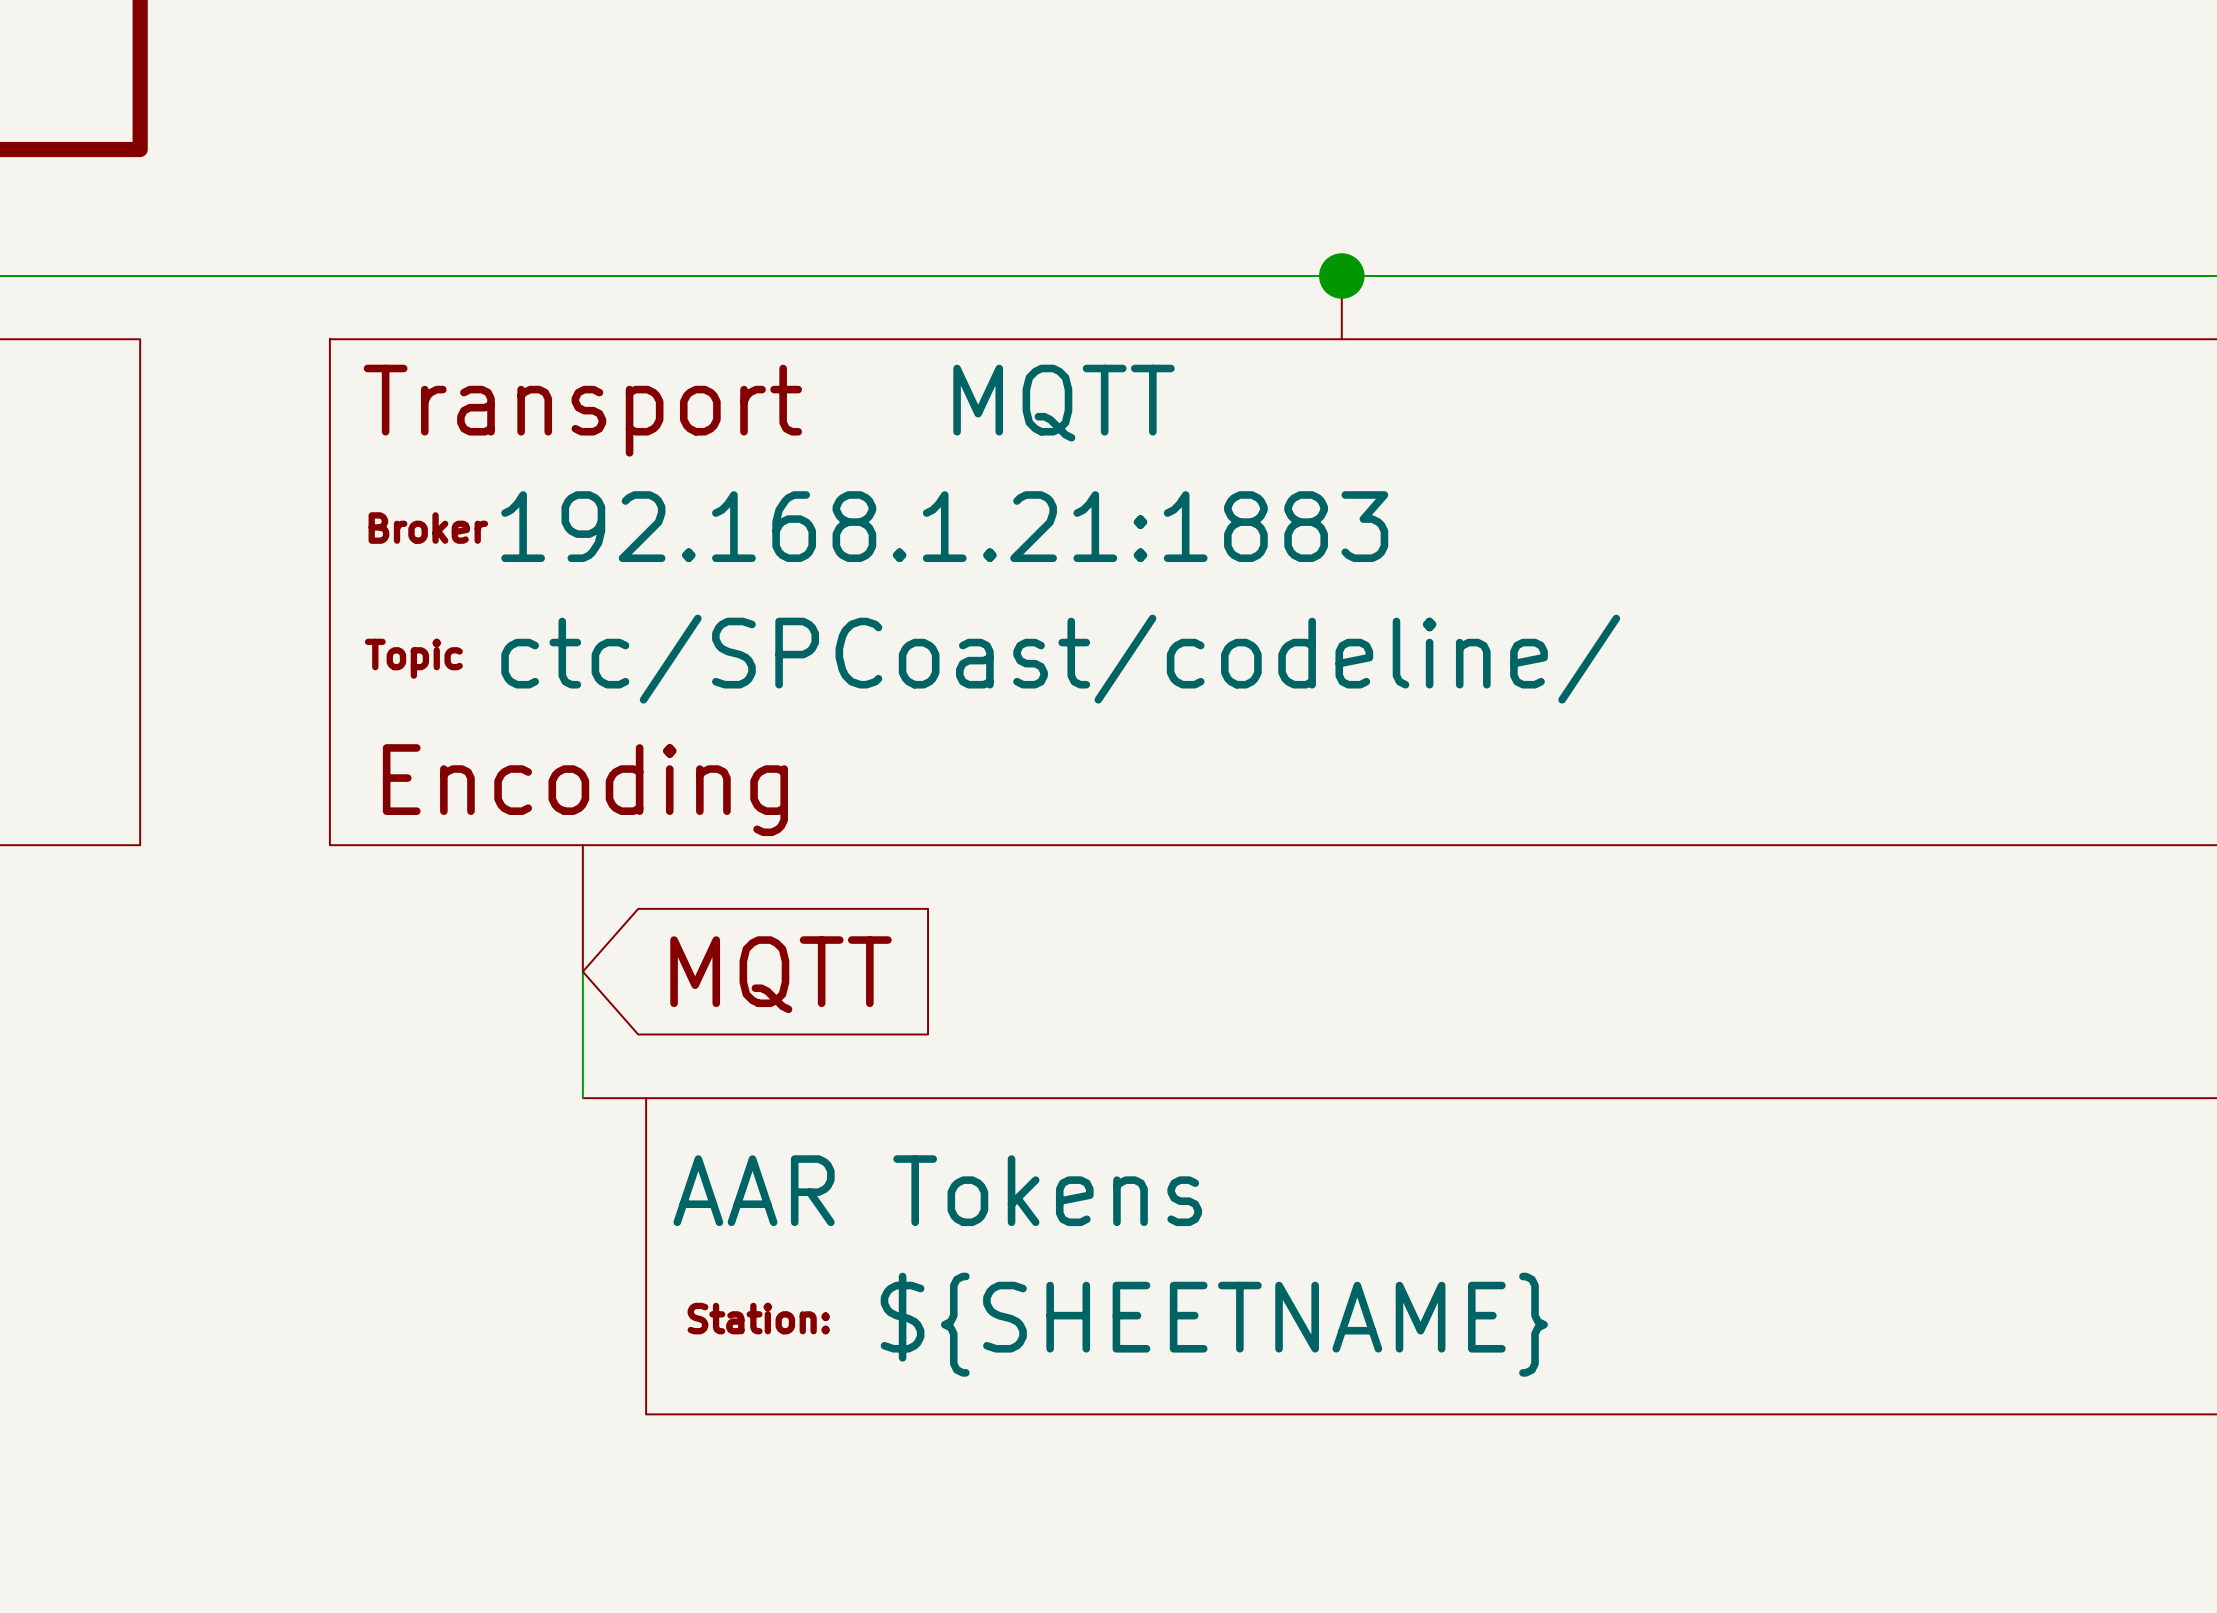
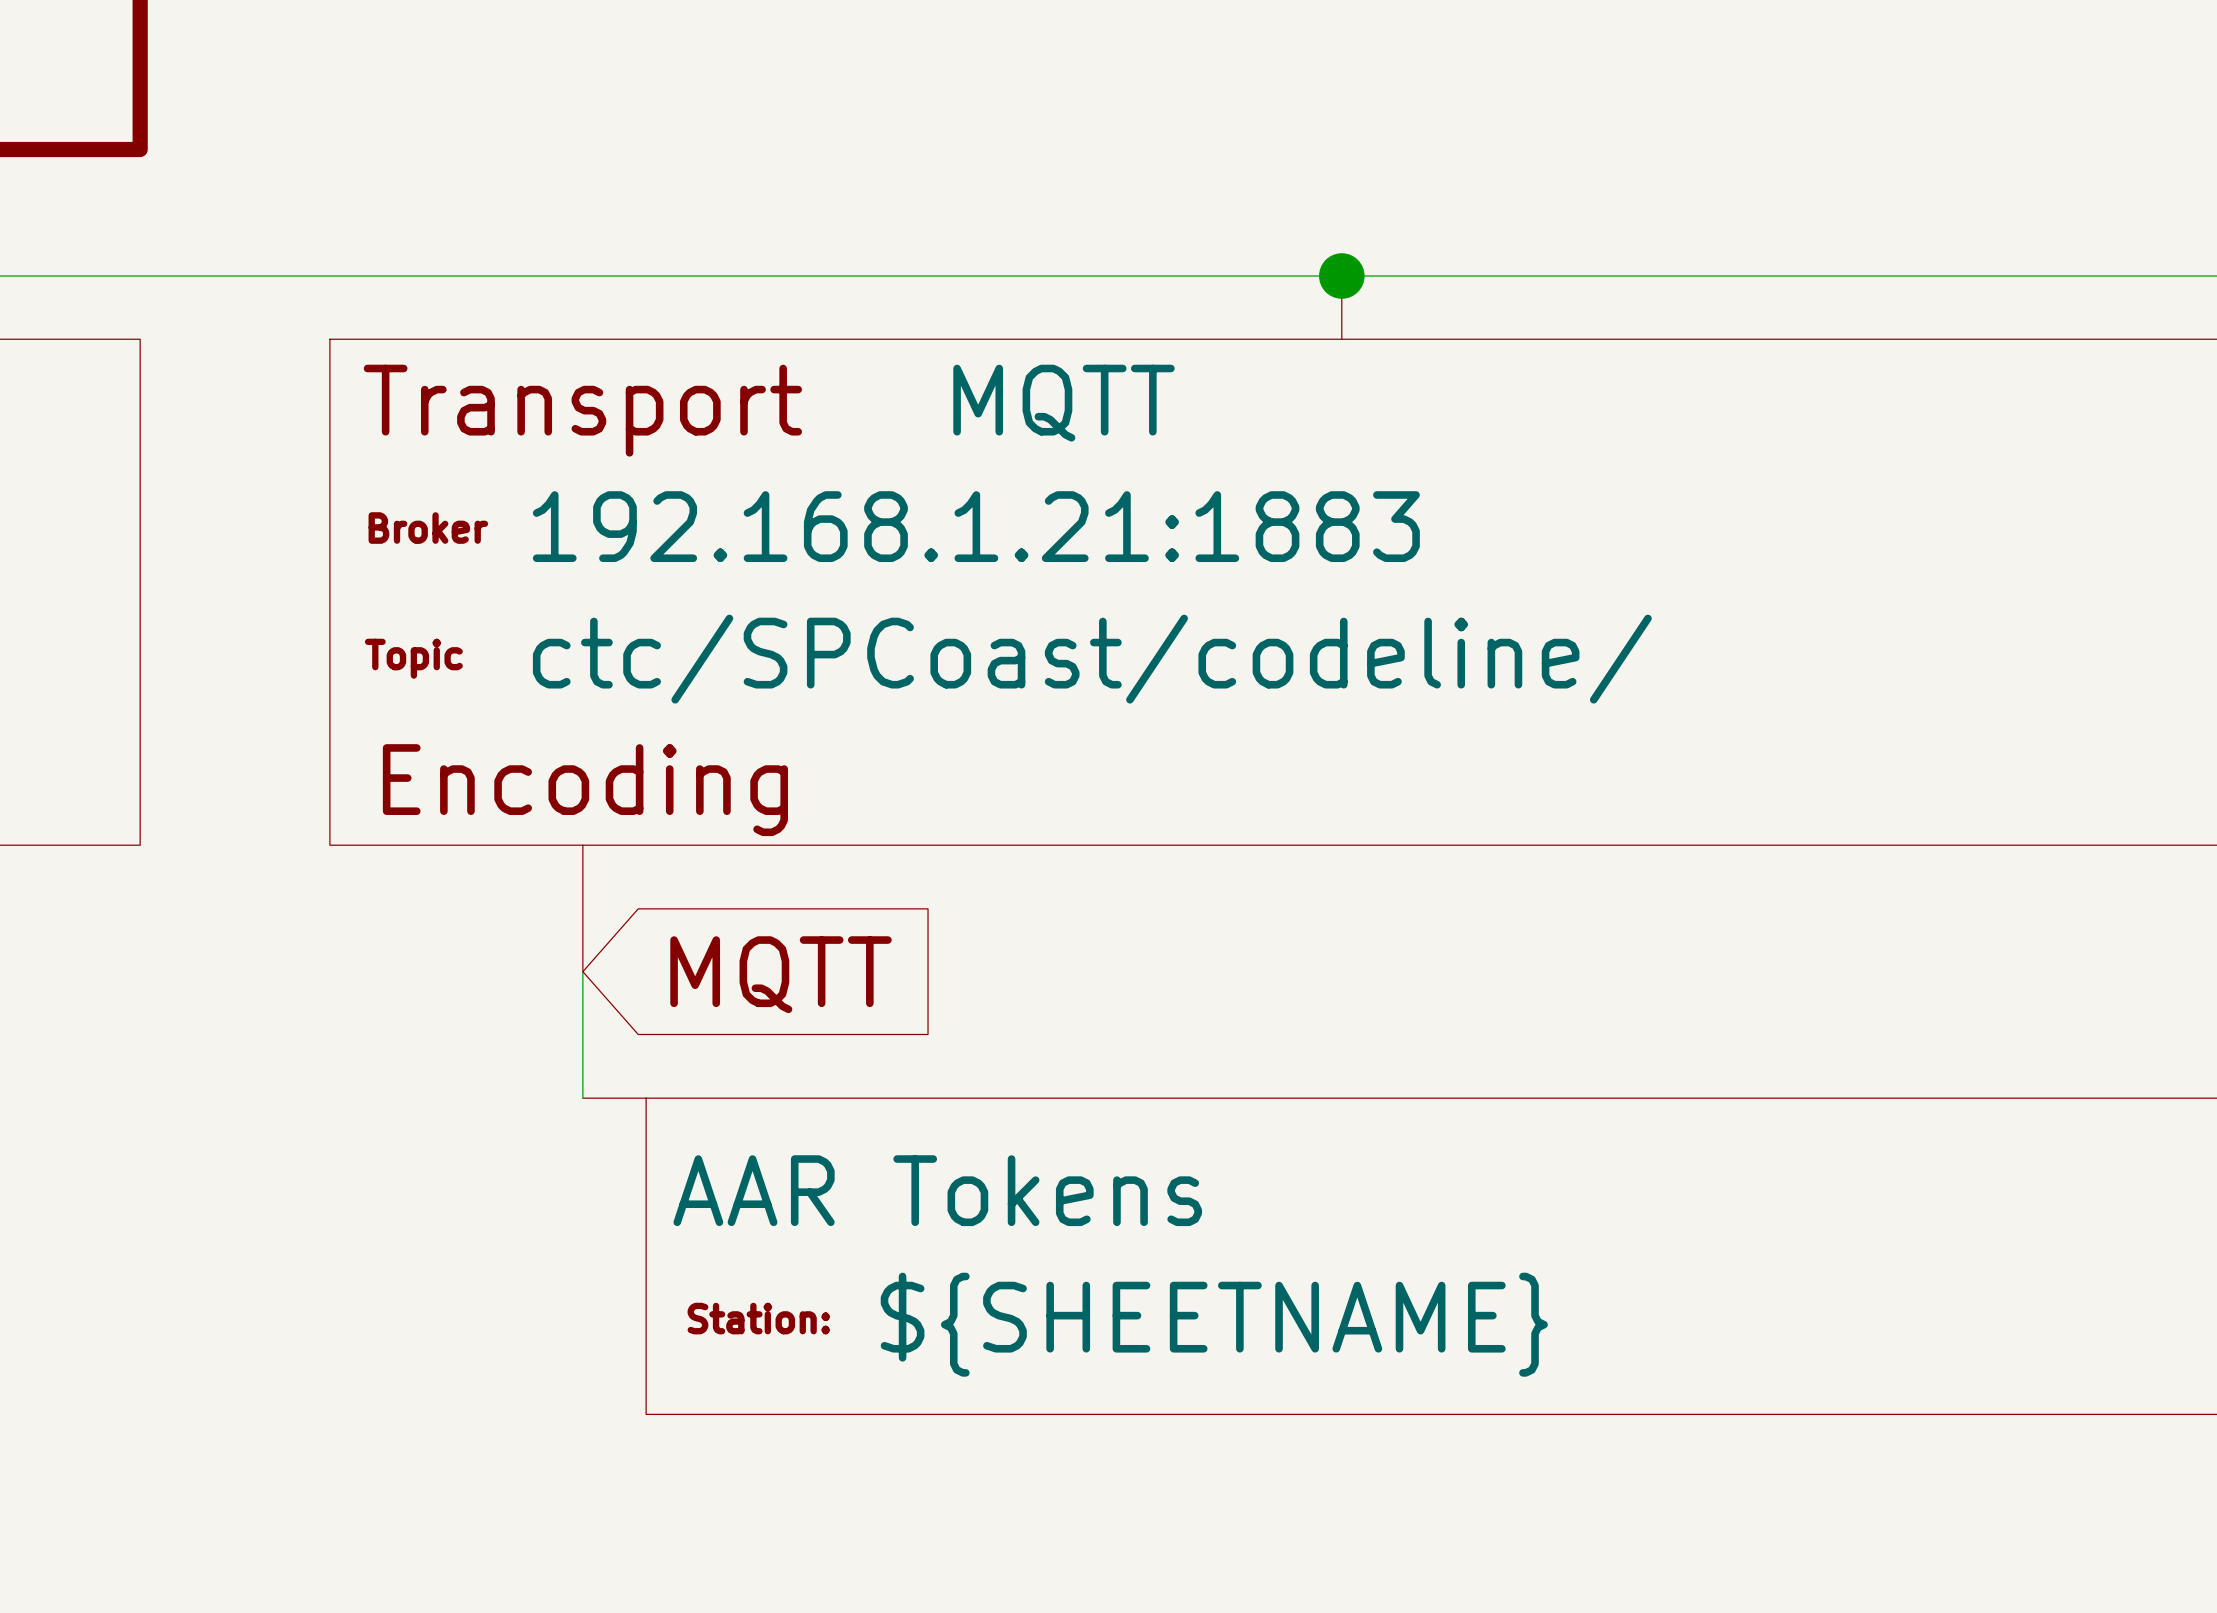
part text position: 192.168.1.21:1883 (944, 526) -> 192.168.1.21:1883 (976, 526)
part text position: ctc/SPCoast/codeline/ (1060, 659) -> ctc/SPCoast/codeline/ (1092, 659)

